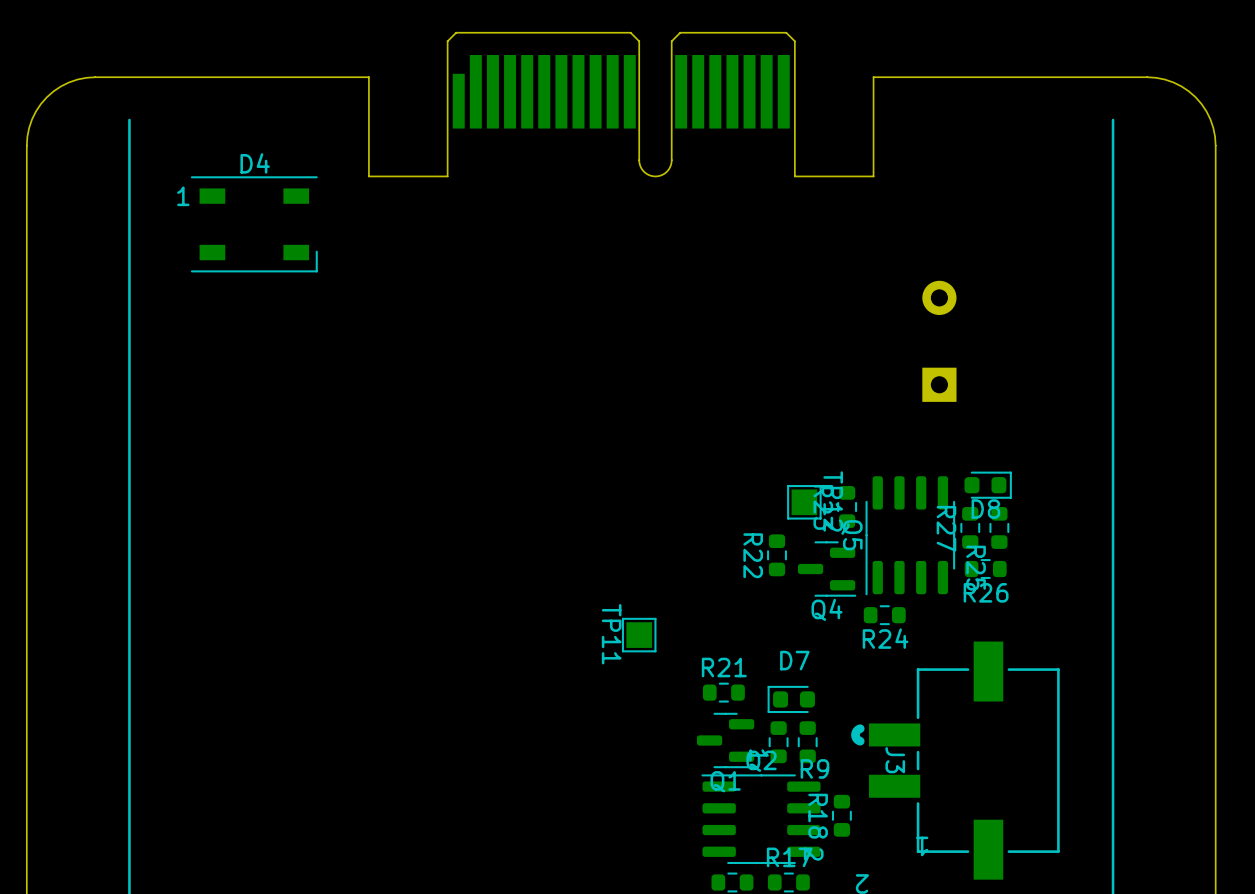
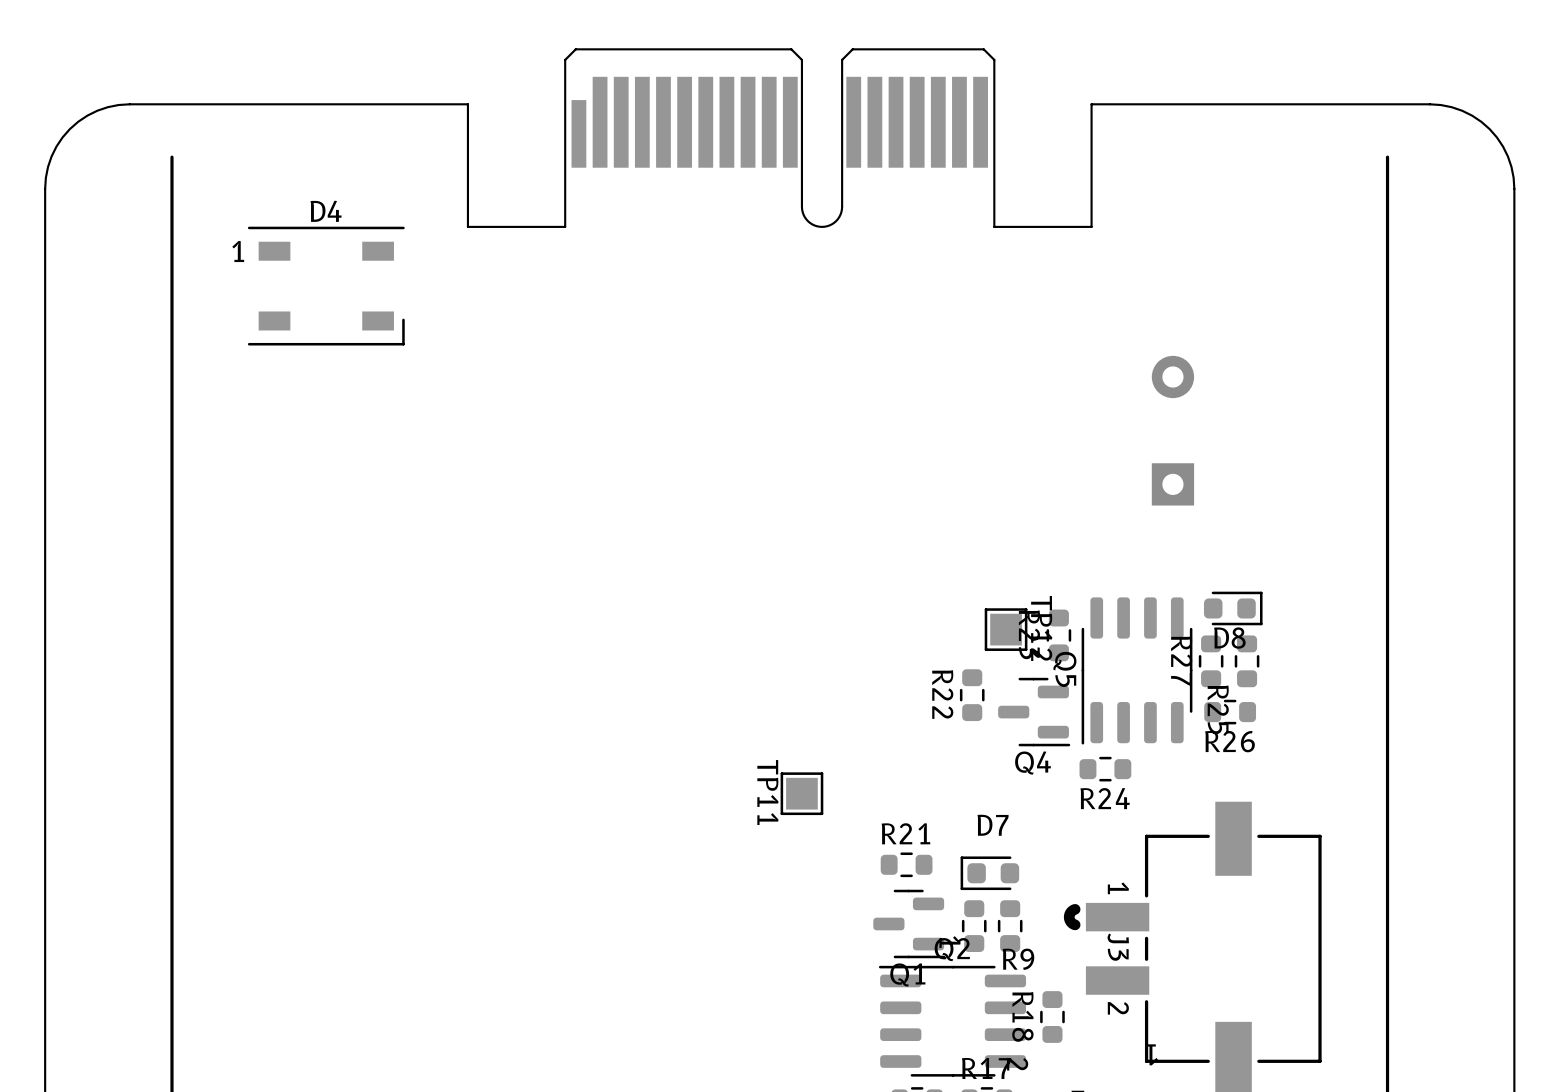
J3 text: none -> 1 (1118, 888)
J3 text: none -> 2 (1118, 1008)

